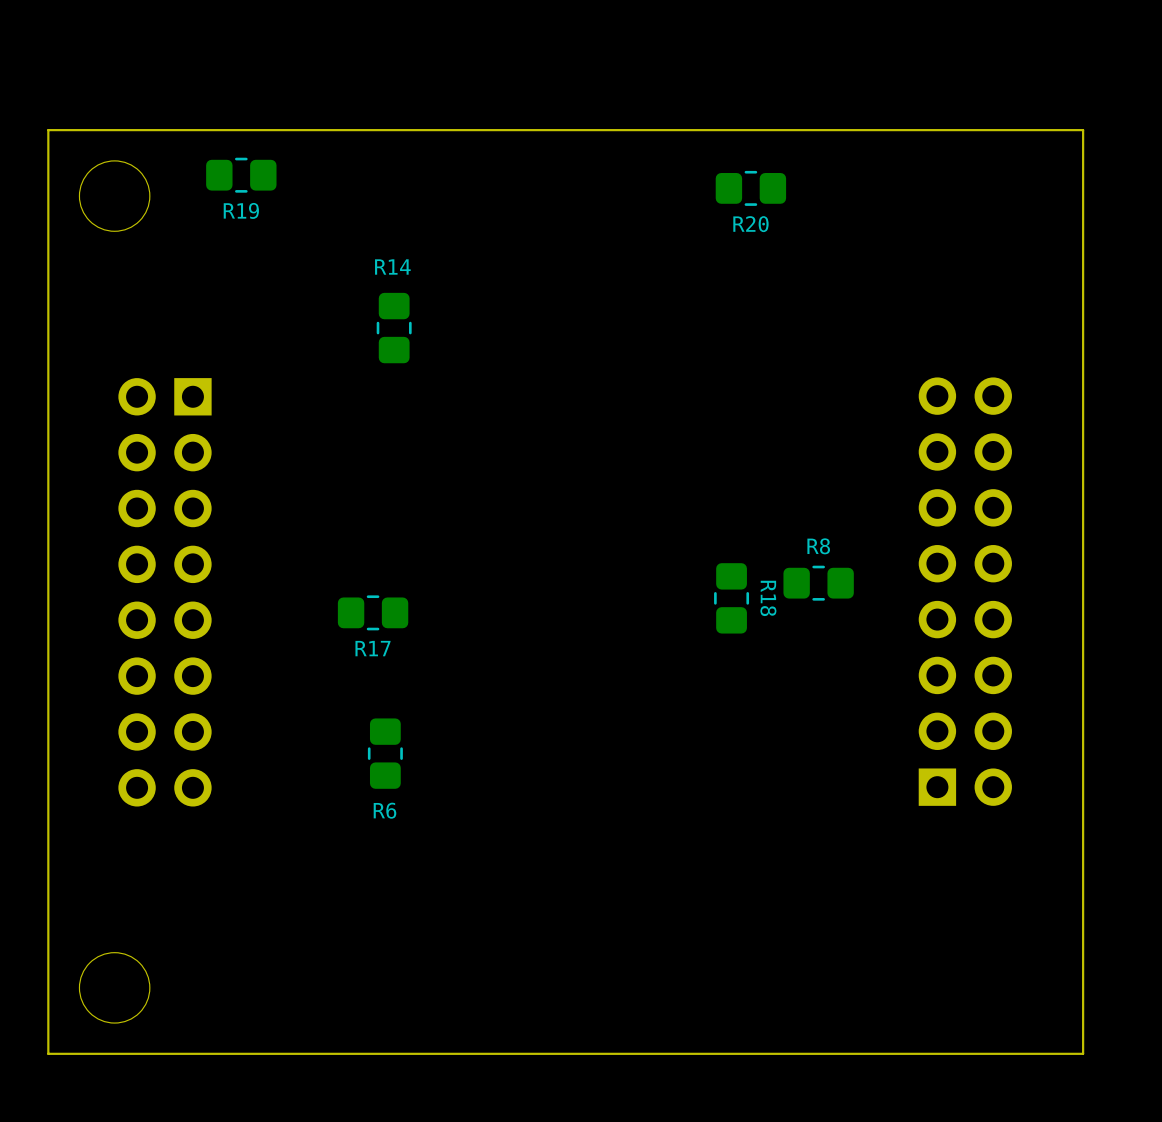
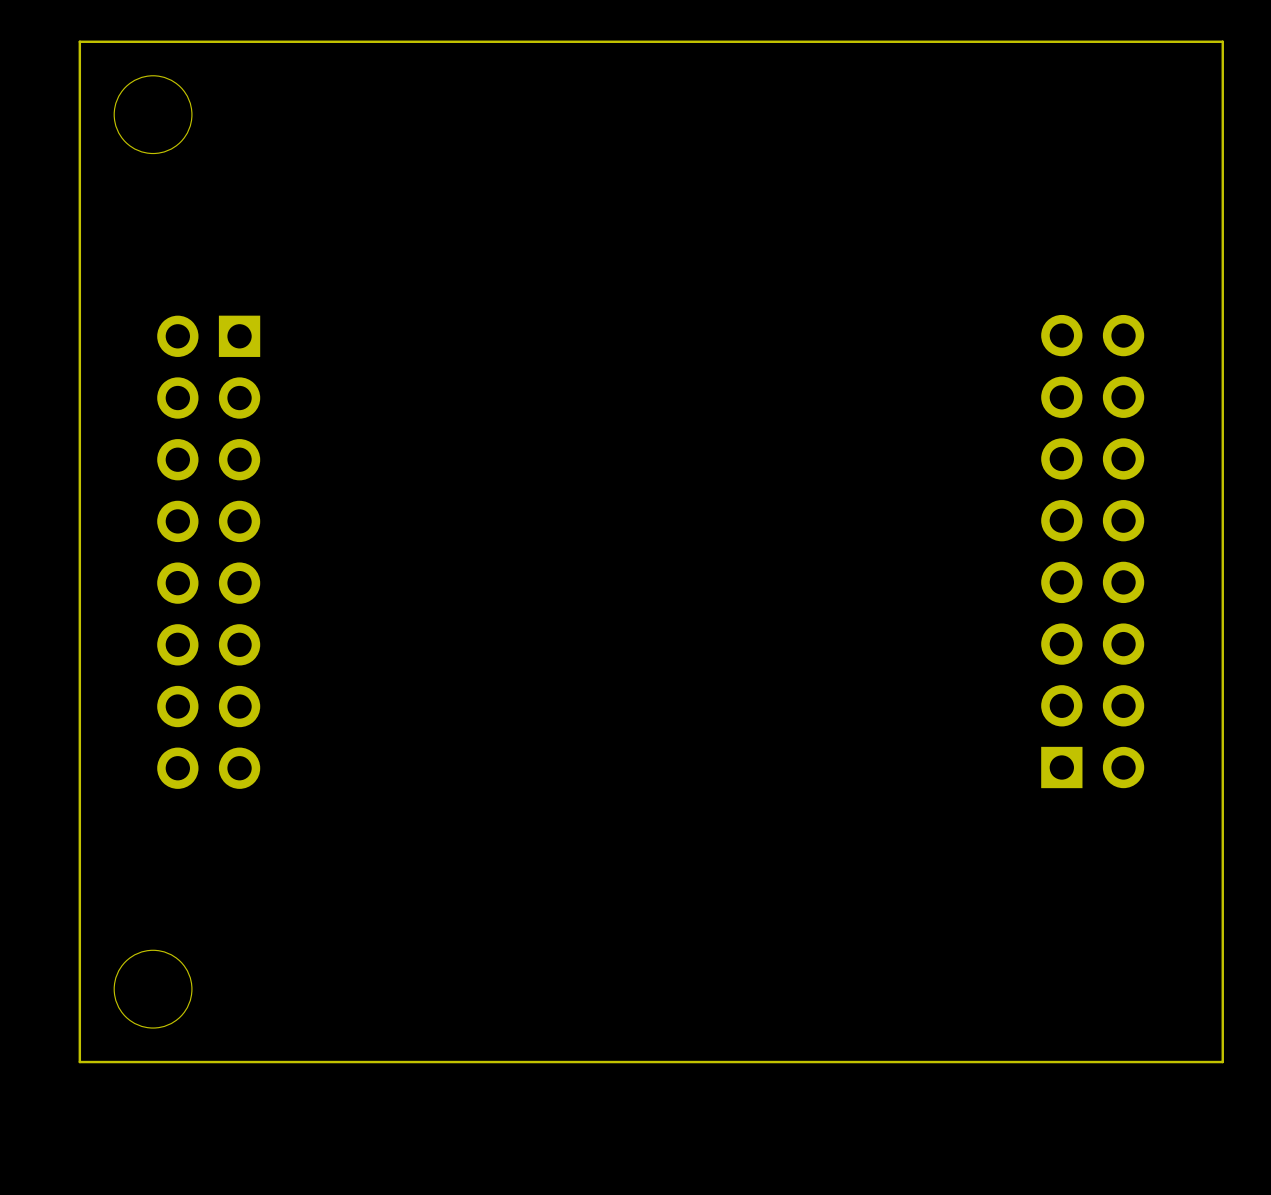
R19: (241, 175) -> none
R20: (750, 188) -> none
R14: (394, 328) -> none
R8: (818, 583) -> none
R18: (731, 598) -> none
R17: (373, 612) -> none
R6: (385, 753) -> none

